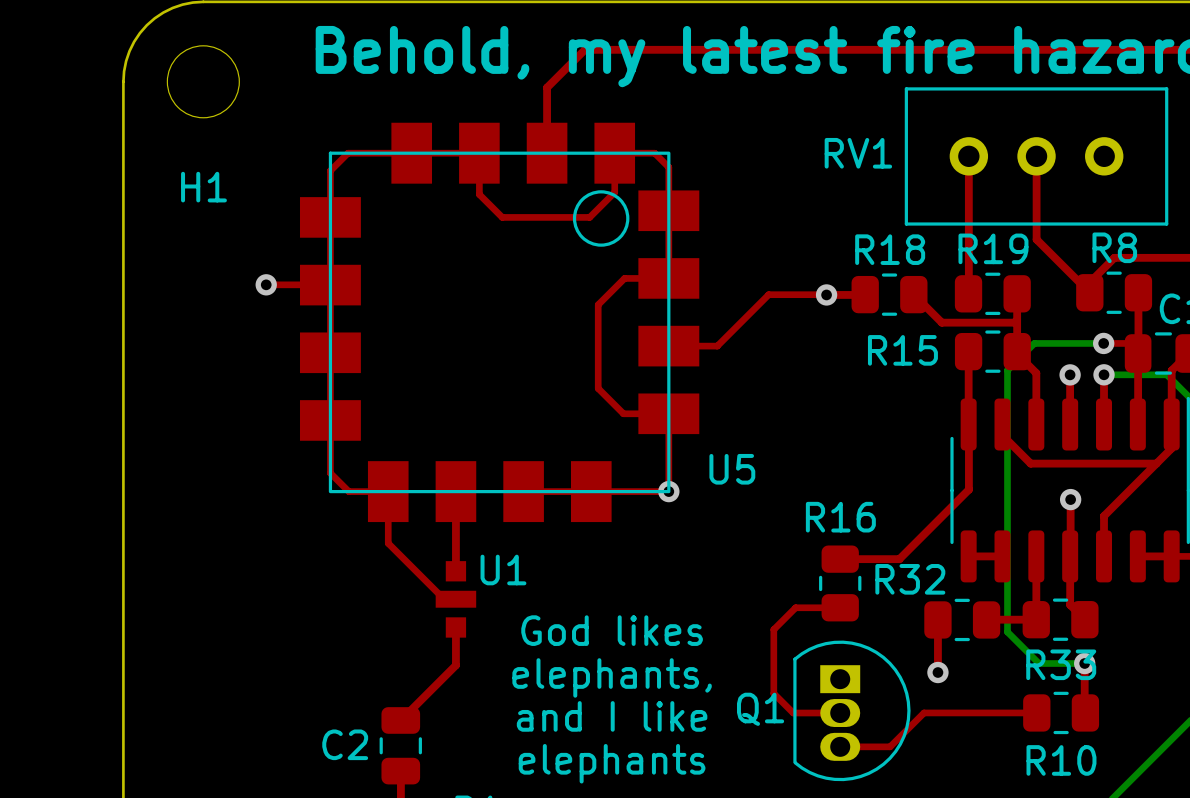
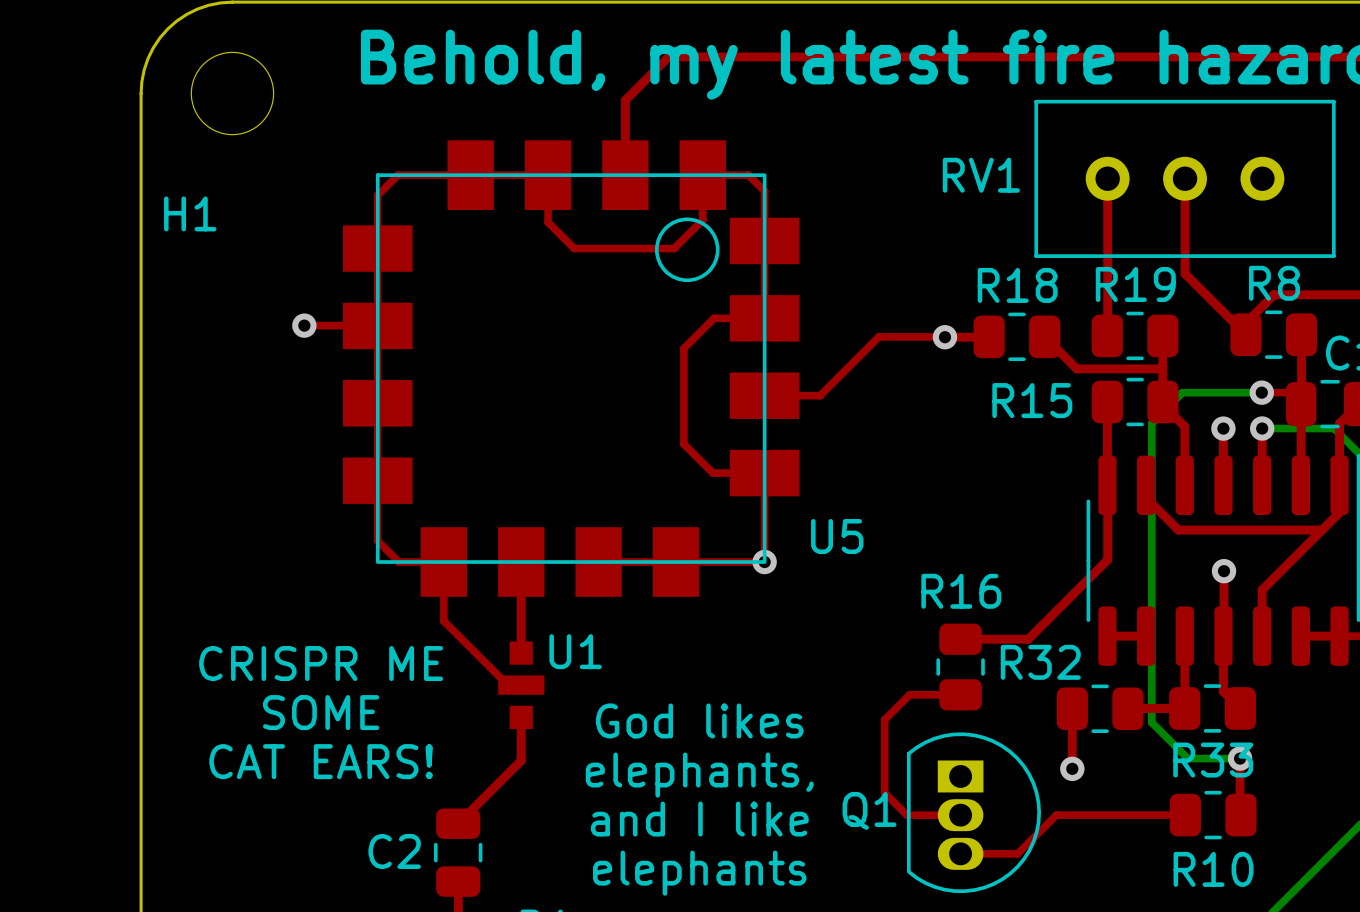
H1 name position: H1 (203, 187) -> H1 (190, 213)
text: none -> CRISPR ME (321, 663)
text: none -> SOME (321, 712)
text: none -> CAT EARS! (321, 761)

